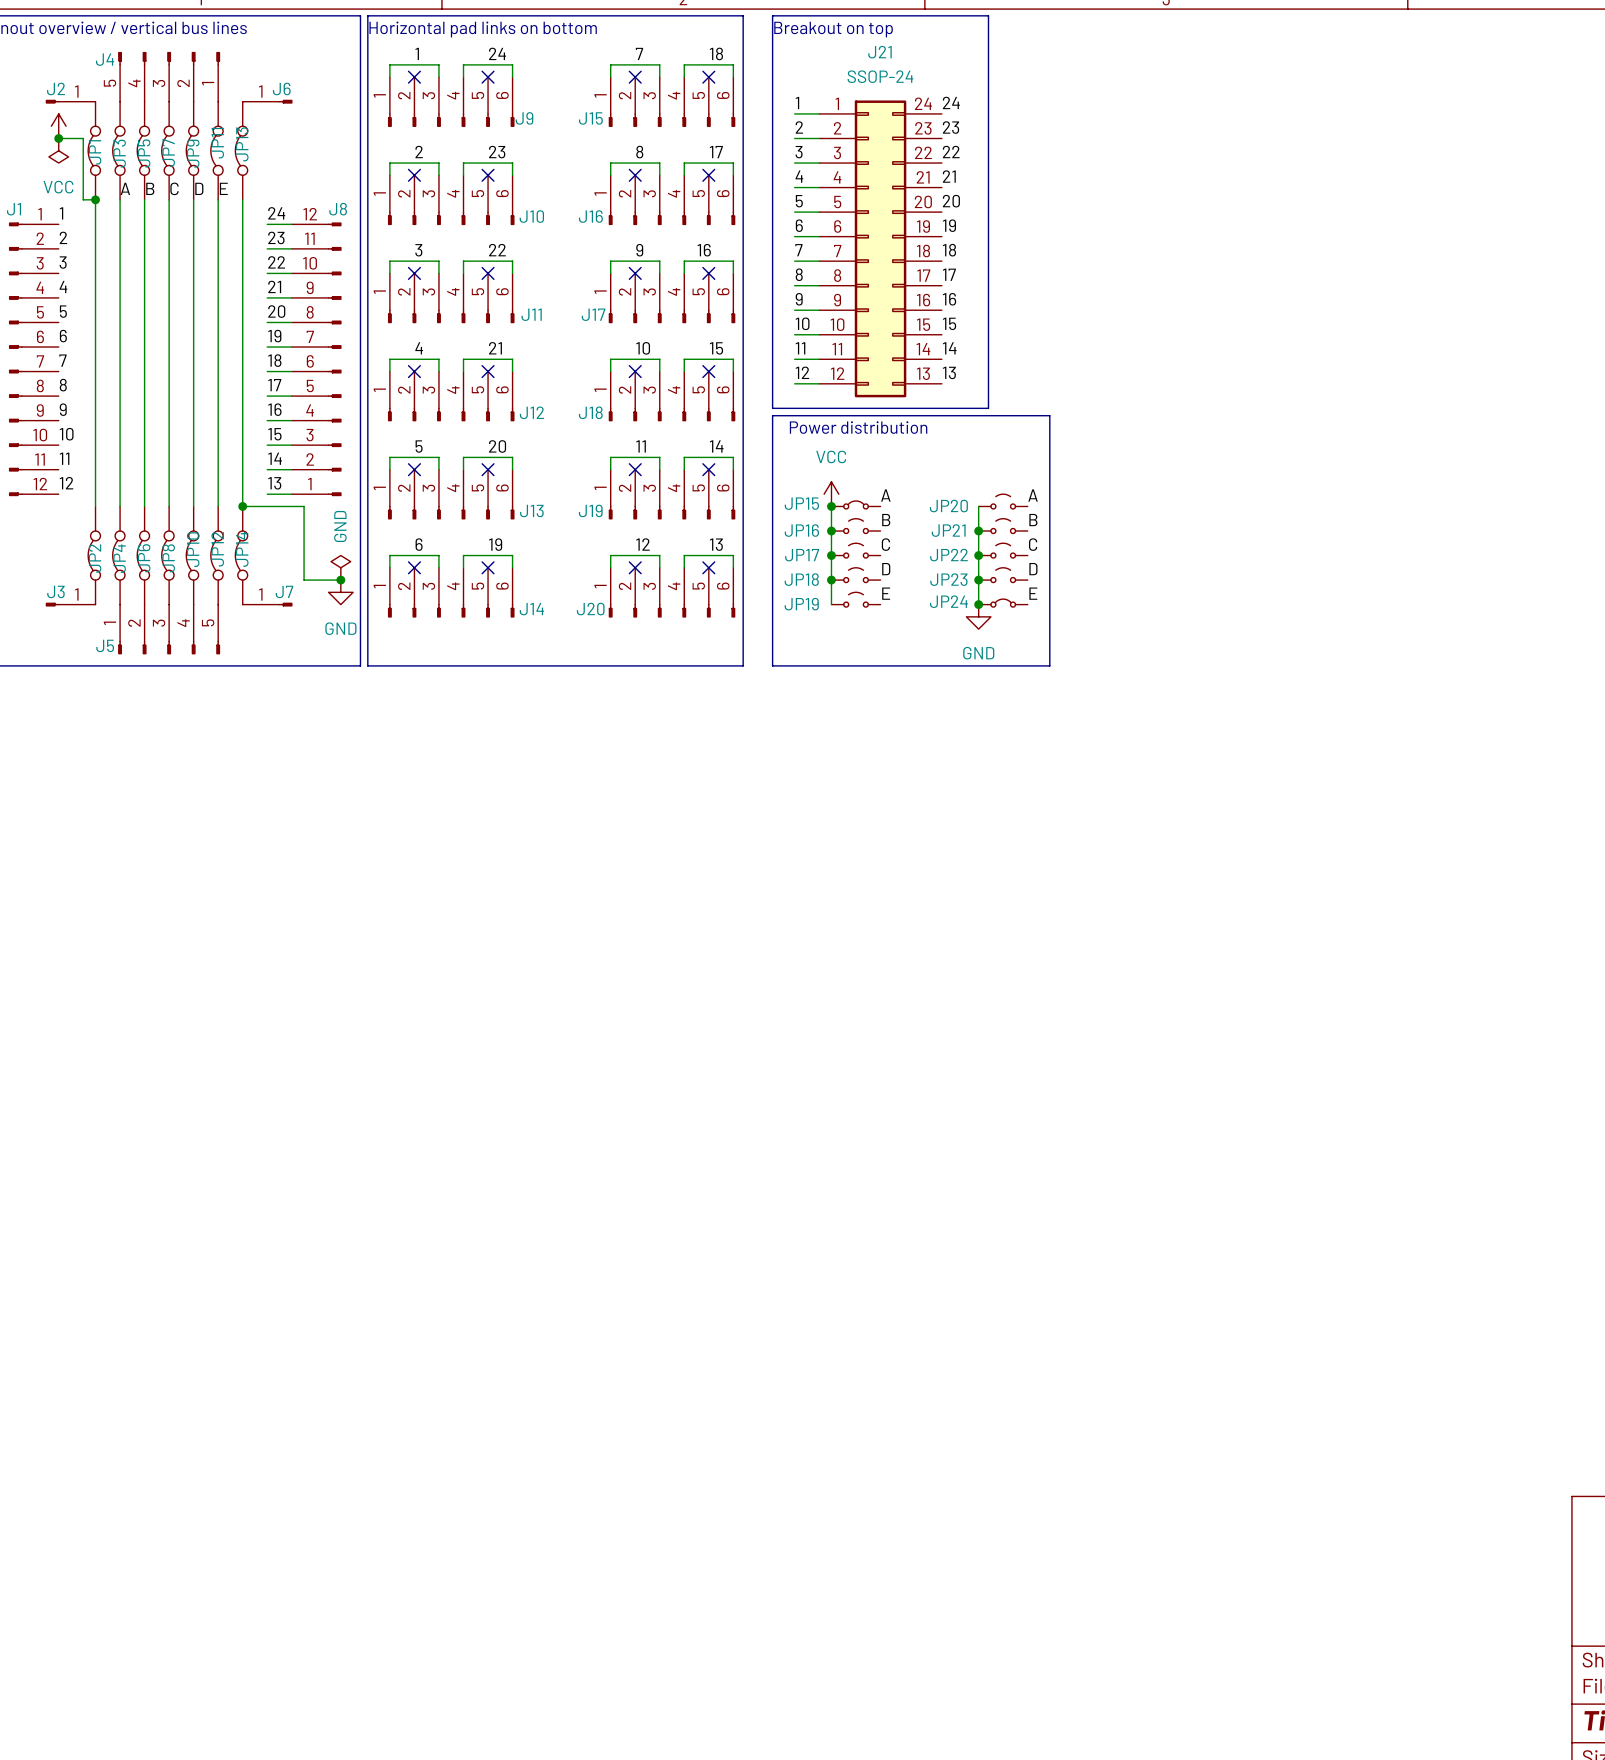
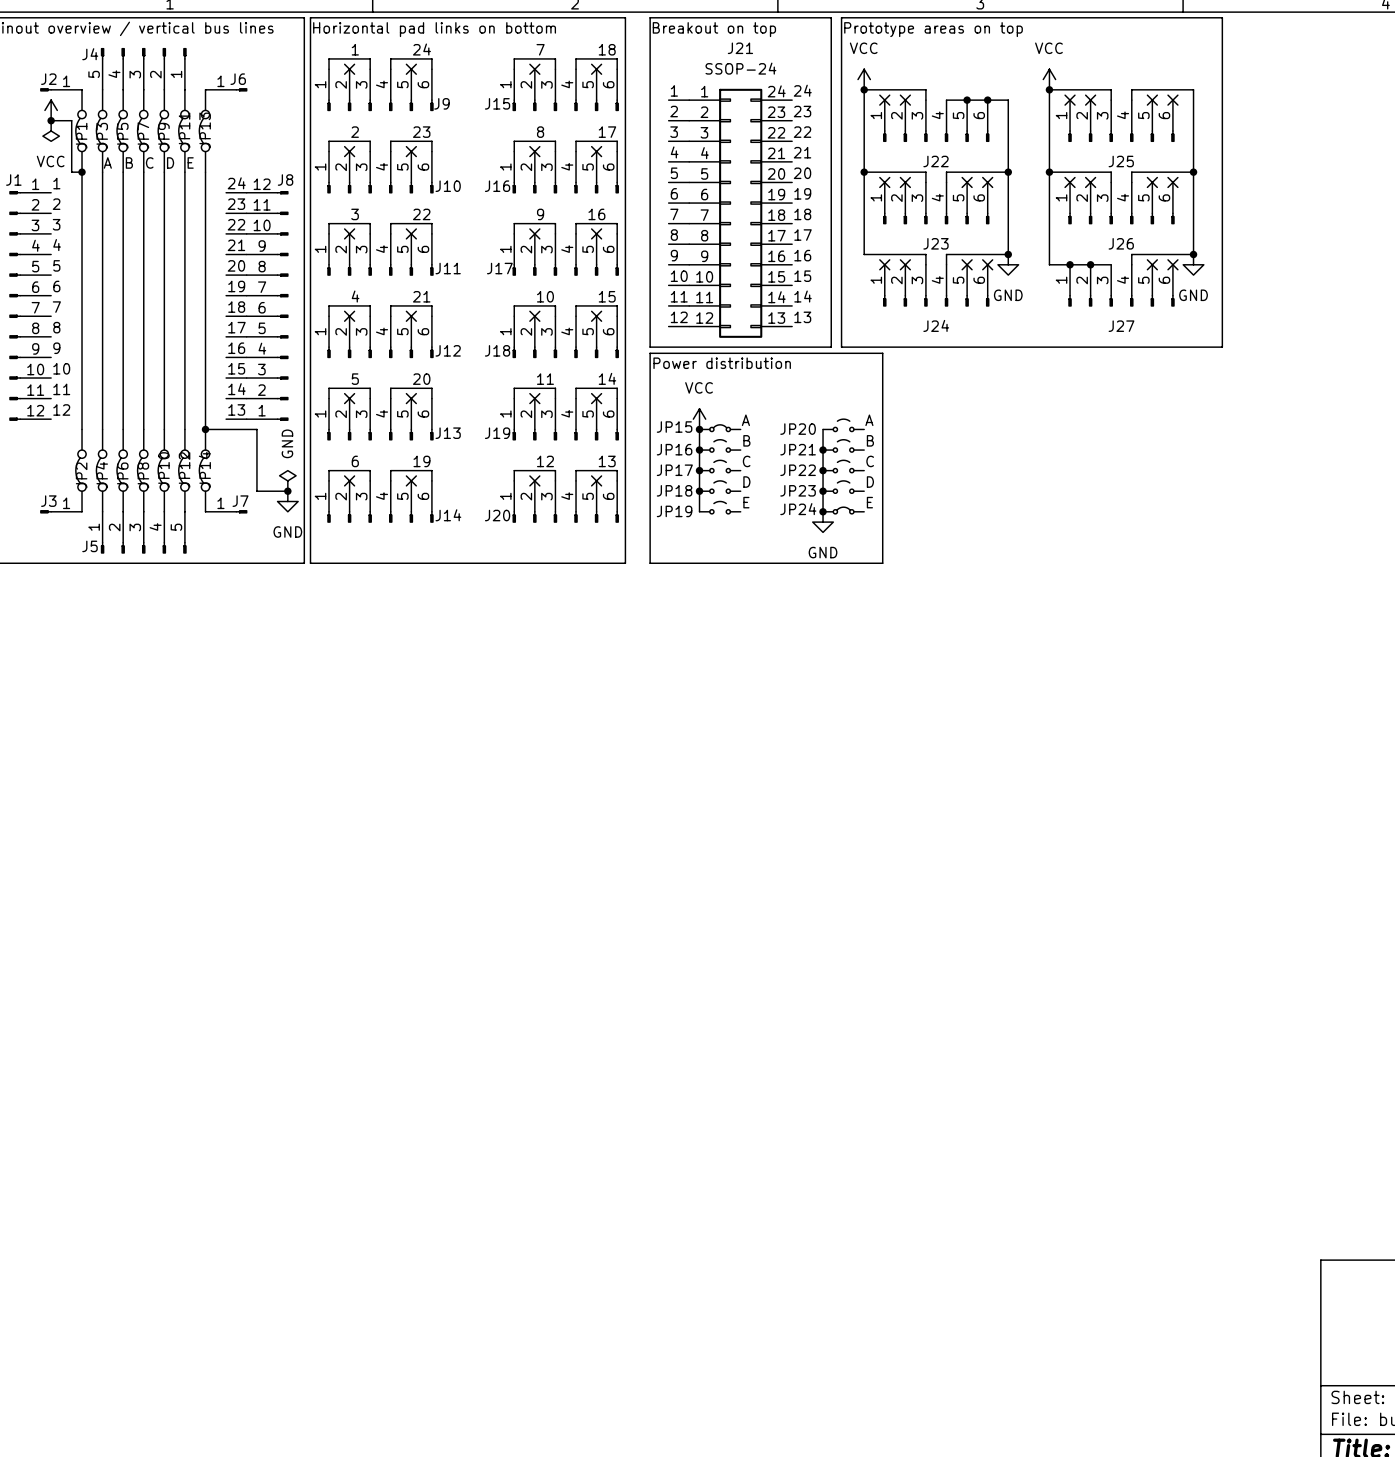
line: none -> (841, 17) (841, 347) (1222, 347) (1222, 17) (841, 17)
text: none -> Prototype areas on top (933, 29)
power symbol: none -> VCC (864, 79)
power symbol: none -> VCC (1049, 79)
junction: none -> (864, 89)
junction: none -> (1049, 89)
no-connect mark: none -> (884, 100)
no-connect mark: none -> (905, 100)
wire: none -> (925, 100) (925, 89) (864, 89) (864, 254) (925, 254) (925, 264)
wire: none -> (946, 100) (1008, 100) (1008, 254) (946, 254) (946, 264)
junction: none -> (967, 100)
junction: none -> (987, 100)
no-connect mark: none -> (1070, 100)
no-connect mark: none -> (1090, 100)
wire: none -> (1111, 100) (1111, 89) (1049, 89) (1049, 264) (1111, 264)
wire: none -> (1131, 100) (1131, 89) (1193, 89) (1193, 254) (1131, 254) (1131, 264)
no-connect mark: none -> (1152, 100)
no-connect mark: none -> (1172, 100)
J22: none -> (936, 121)
J25: none -> (1121, 121)
wire: none -> (864, 172) (925, 172) (925, 182)
junction: none -> (864, 172)
wire: none -> (1008, 172) (946, 172) (946, 182)
junction: none -> (1008, 172)
wire: none -> (1049, 172) (1111, 172) (1111, 182)
junction: none -> (1049, 172)
wire: none -> (1193, 172) (1131, 172) (1131, 182)
junction: none -> (1193, 172)
no-connect mark: none -> (884, 182)
no-connect mark: none -> (905, 182)
no-connect mark: none -> (967, 182)
no-connect mark: none -> (987, 182)
no-connect mark: none -> (1070, 182)
no-connect mark: none -> (1090, 182)
no-connect mark: none -> (1152, 182)
no-connect mark: none -> (1172, 182)
J23: none -> (936, 203)
J26: none -> (1121, 203)
junction: none -> (1008, 254)
junction: none -> (1193, 254)
no-connect mark: none -> (884, 264)
no-connect mark: none -> (905, 264)
no-connect mark: none -> (967, 264)
no-connect mark: none -> (987, 264)
power symbol: none -> GND (1008, 264)
junction: none -> (1070, 264)
junction: none -> (1090, 264)
no-connect mark: none -> (1152, 264)
no-connect mark: none -> (1172, 264)
power symbol: none -> GND (1193, 264)
J24: none -> (936, 285)
J27: none -> (1121, 285)

